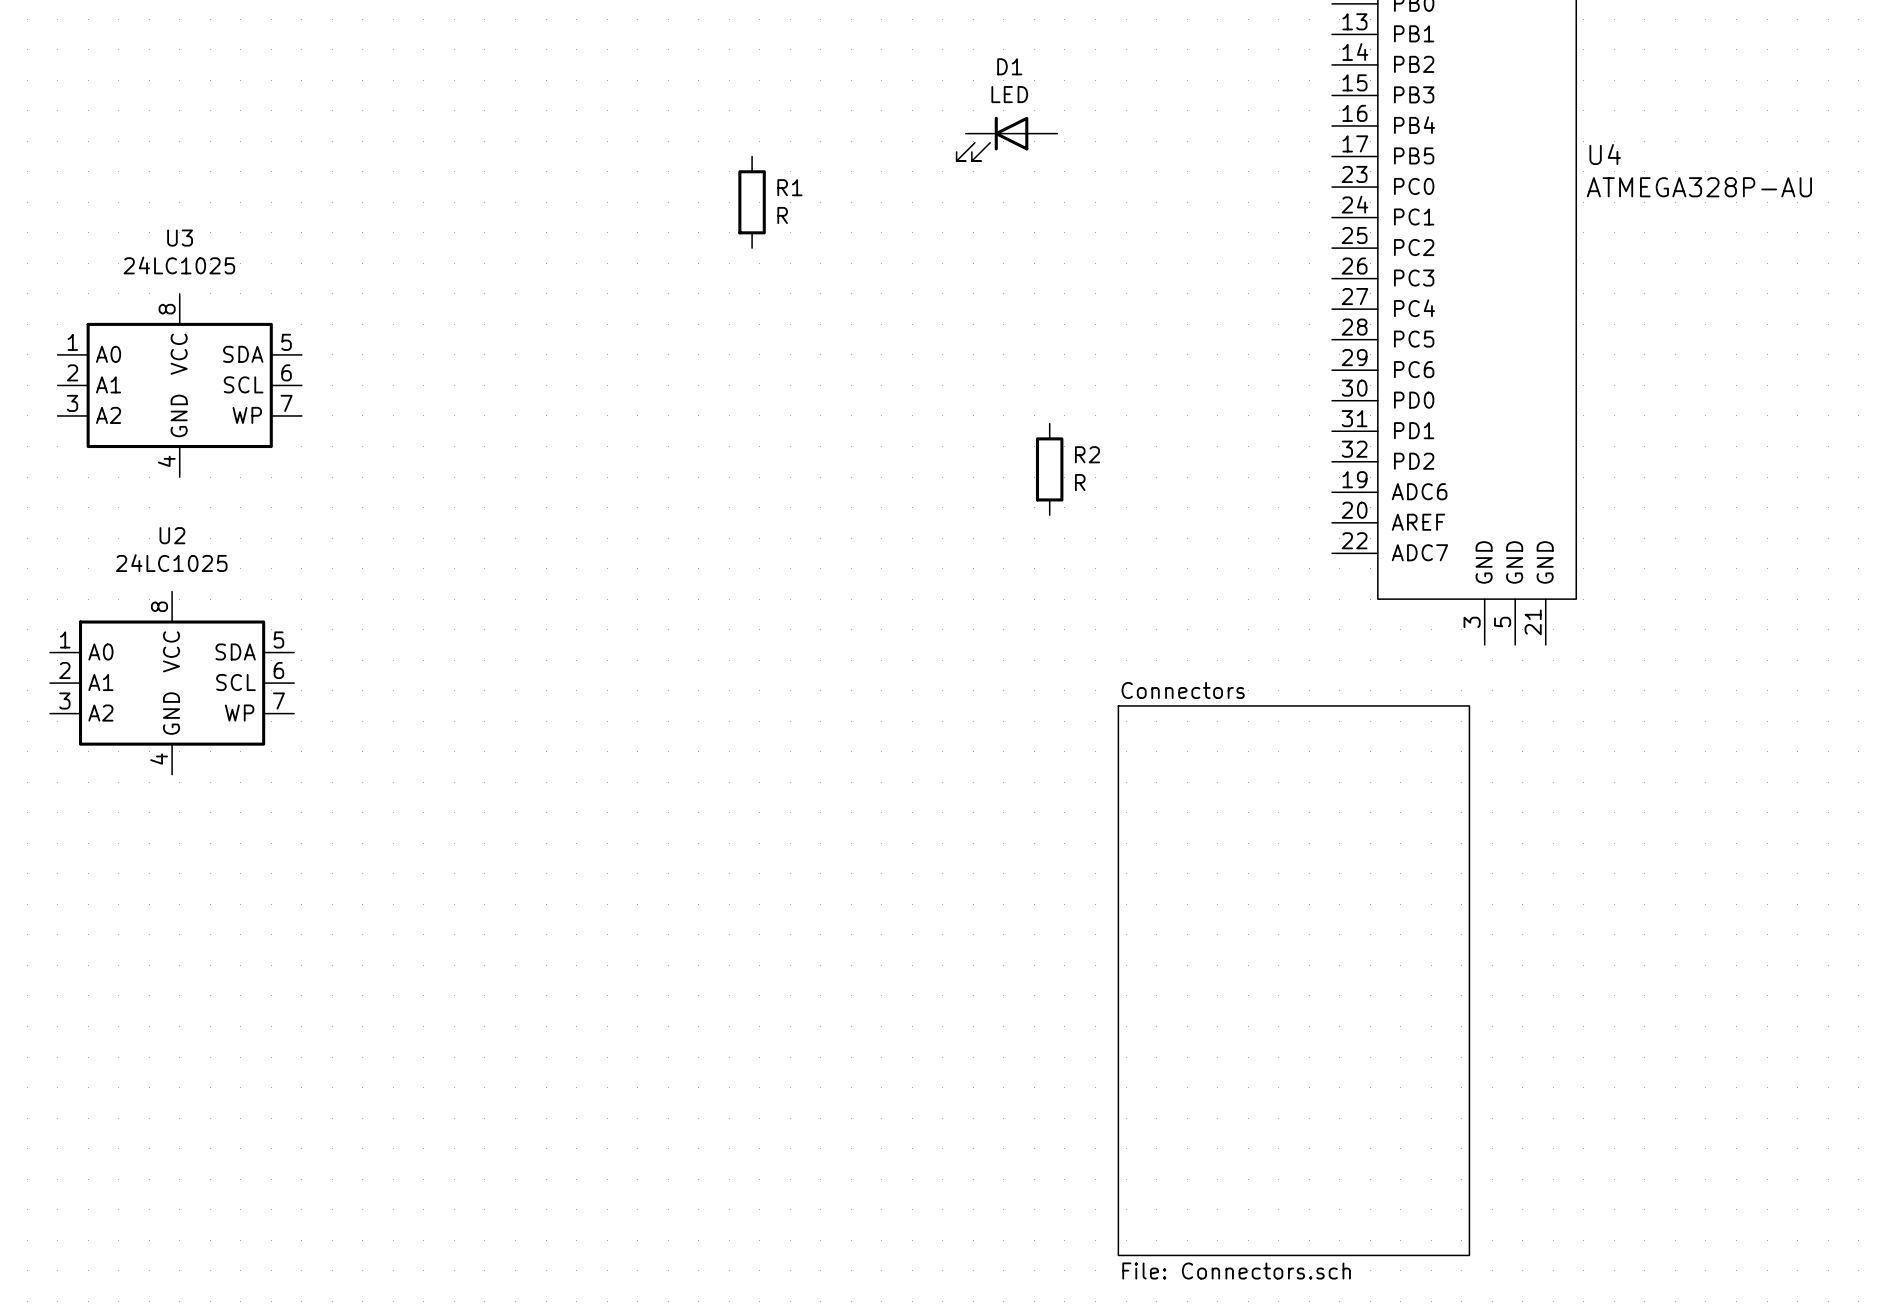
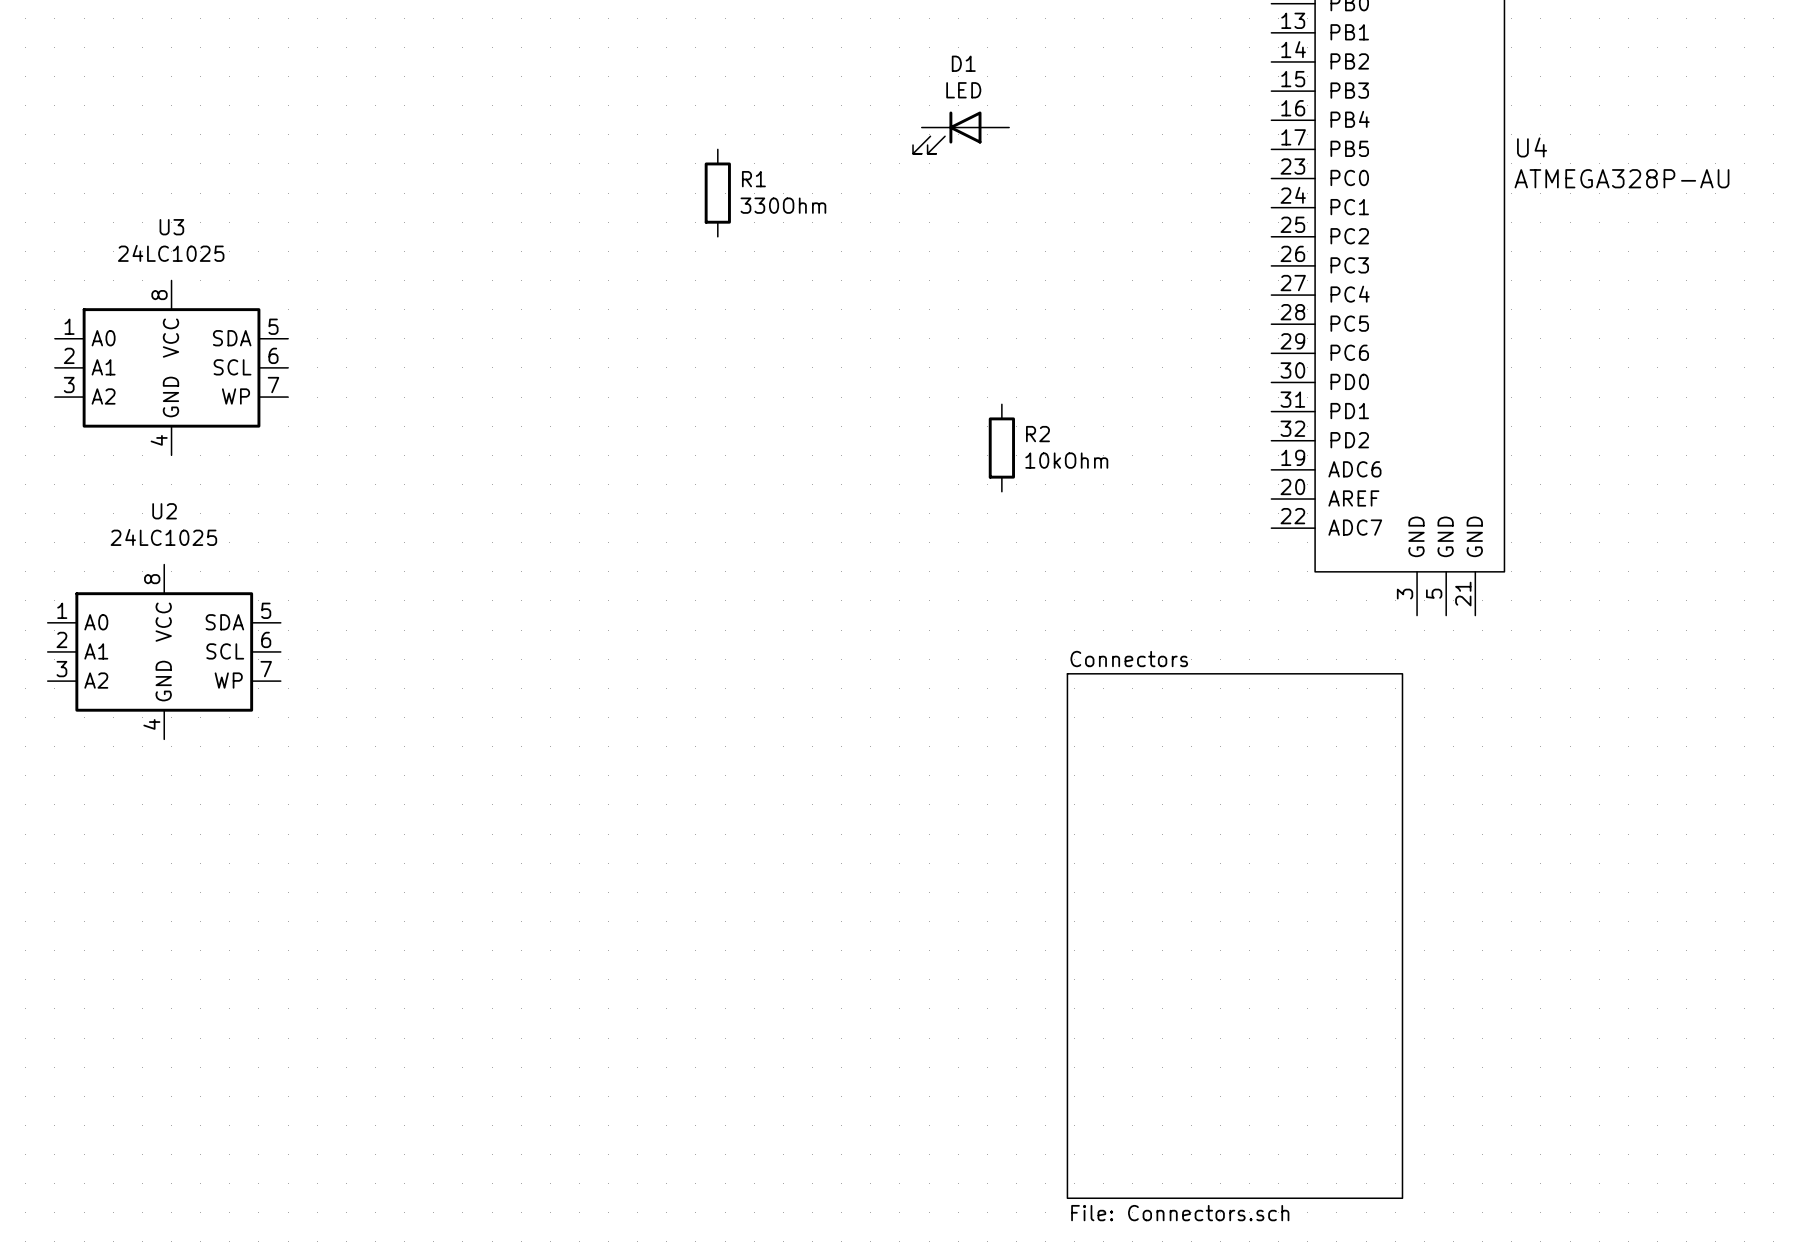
R1 value: R (782, 215) -> 330Ohm (783, 205)
R2 value: R (1080, 482) -> 10kOhm (1066, 460)

